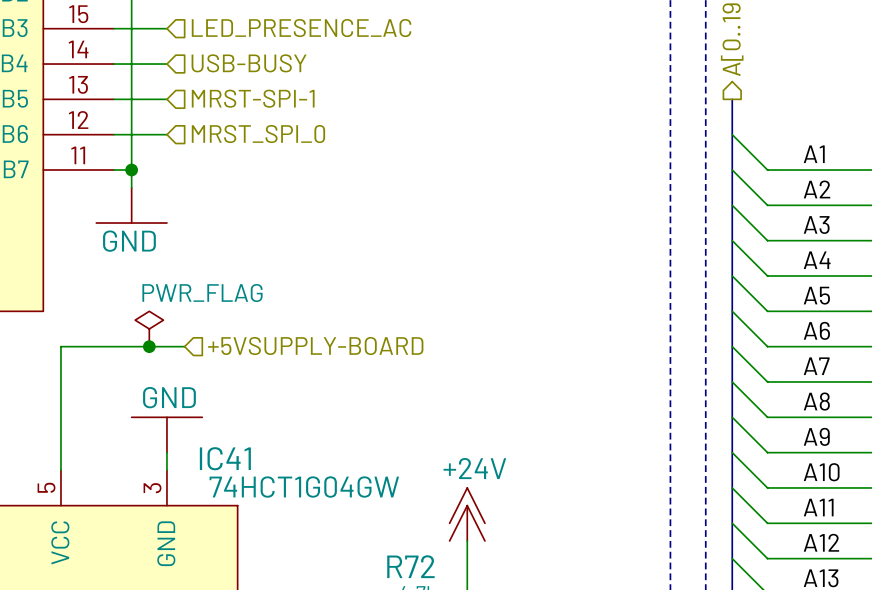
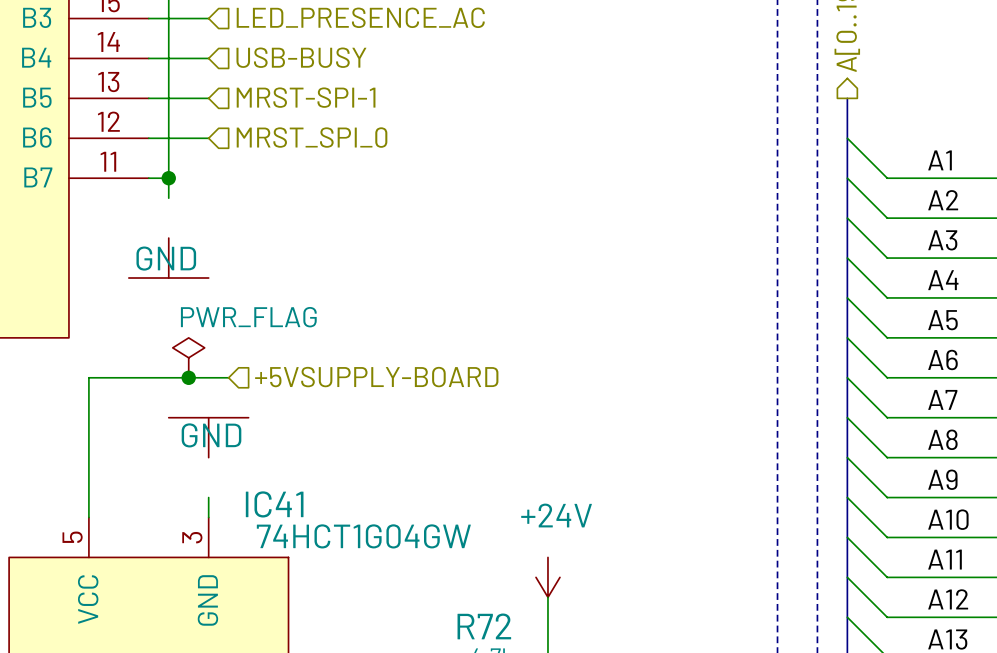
power symbol position: GND (131, 205) -> GND (168, 258)
power symbol position: GND (166, 434) -> GND (208, 437)
power symbol shape: [449, 487, 485, 541] -> [536, 557, 560, 598]

